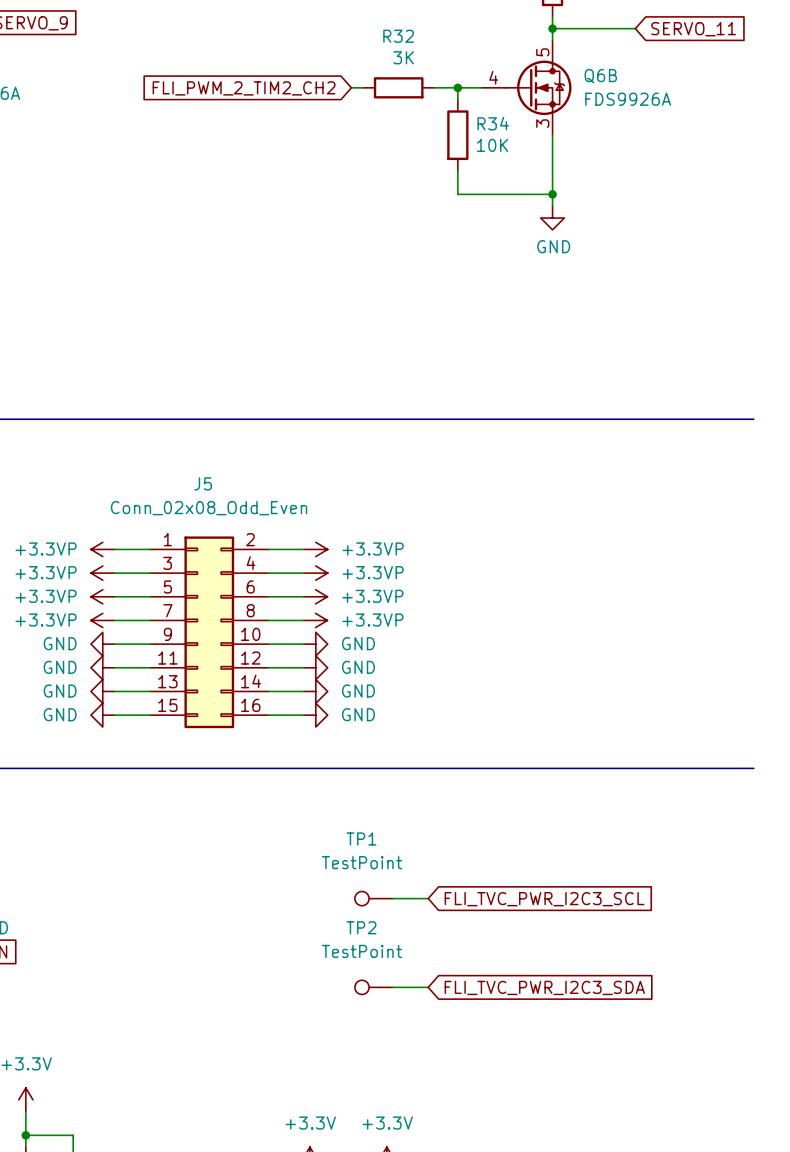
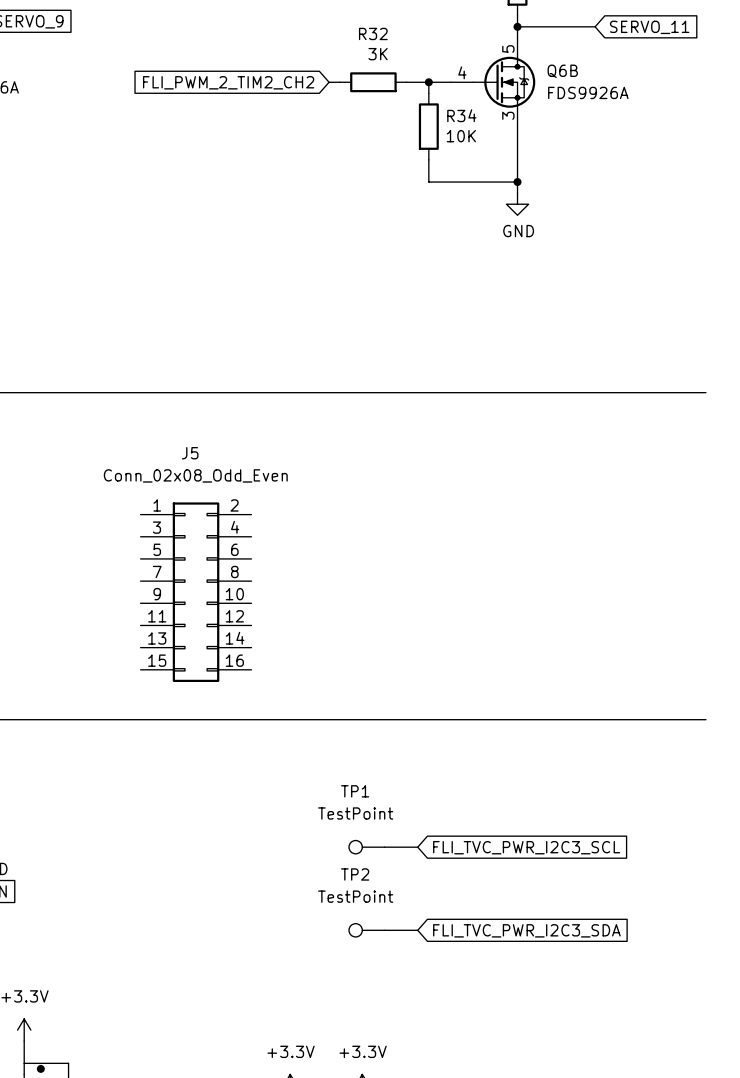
power symbol: +3.3VP (102, 549) -> none
wire: (114, 549) (150, 549) -> none
wire: (268, 549) (303, 549) -> none
power symbol: +3.3VP (315, 549) -> none
power symbol: +3.3VP (102, 573) -> none
wire: (114, 573) (150, 573) -> none
wire: (268, 573) (303, 573) -> none
power symbol: +3.3VP (315, 573) -> none
power symbol: +3.3VP (102, 596) -> none
wire: (114, 596) (150, 596) -> none
wire: (268, 596) (303, 596) -> none
power symbol: +3.3VP (315, 596) -> none
power symbol: +3.3VP (102, 620) -> none
wire: (114, 620) (150, 620) -> none
wire: (268, 620) (303, 620) -> none
power symbol: +3.3VP (315, 620) -> none
power symbol: GND (102, 644) -> none
wire: (114, 644) (150, 644) -> none
wire: (268, 644) (303, 644) -> none
power symbol: GND (315, 644) -> none
power symbol: GND (102, 667) -> none
wire: (114, 667) (150, 667) -> none
wire: (268, 667) (303, 667) -> none
power symbol: GND (315, 667) -> none
power symbol: GND (102, 691) -> none
wire: (114, 691) (150, 691) -> none
wire: (268, 691) (303, 691) -> none
power symbol: GND (315, 691) -> none
power symbol: GND (102, 715) -> none
wire: (114, 715) (150, 715) -> none
wire: (268, 715) (303, 715) -> none
power symbol: GND (315, 715) -> none
TP1 position: (373, 898) -> (366, 847)
wire: (392, 898) (428, 898) -> (384, 847) (417, 847)
global label position: FLI_TVC_PWR_I2C3_SCL (544, 899) -> FLI_TVC_PWR_I2C3_SCL (526, 847)
TP2 position: (373, 987) -> (366, 930)
wire: (392, 987) (428, 987) -> (384, 930) (417, 930)
global label position: FLI_TVC_PWR_I2C3_SDA (544, 987) -> FLI_TVC_PWR_I2C3_SDA (526, 930)
junction position: (25, 1135) -> (40, 1068)

